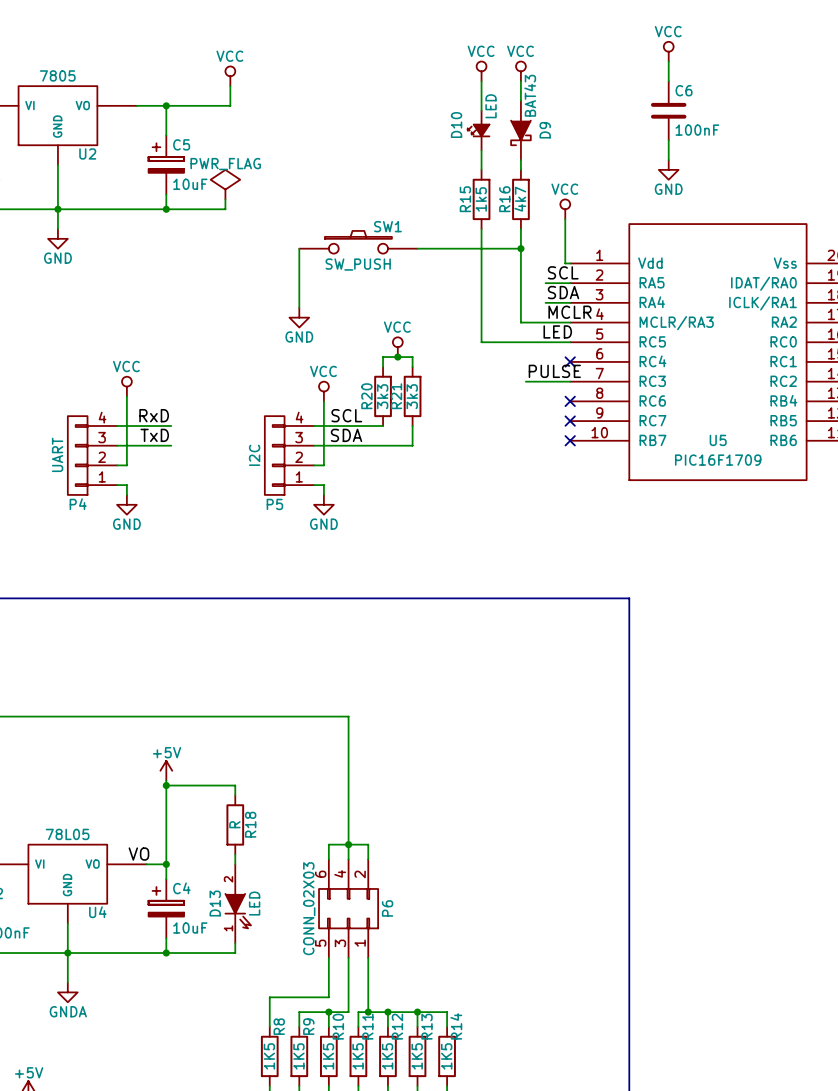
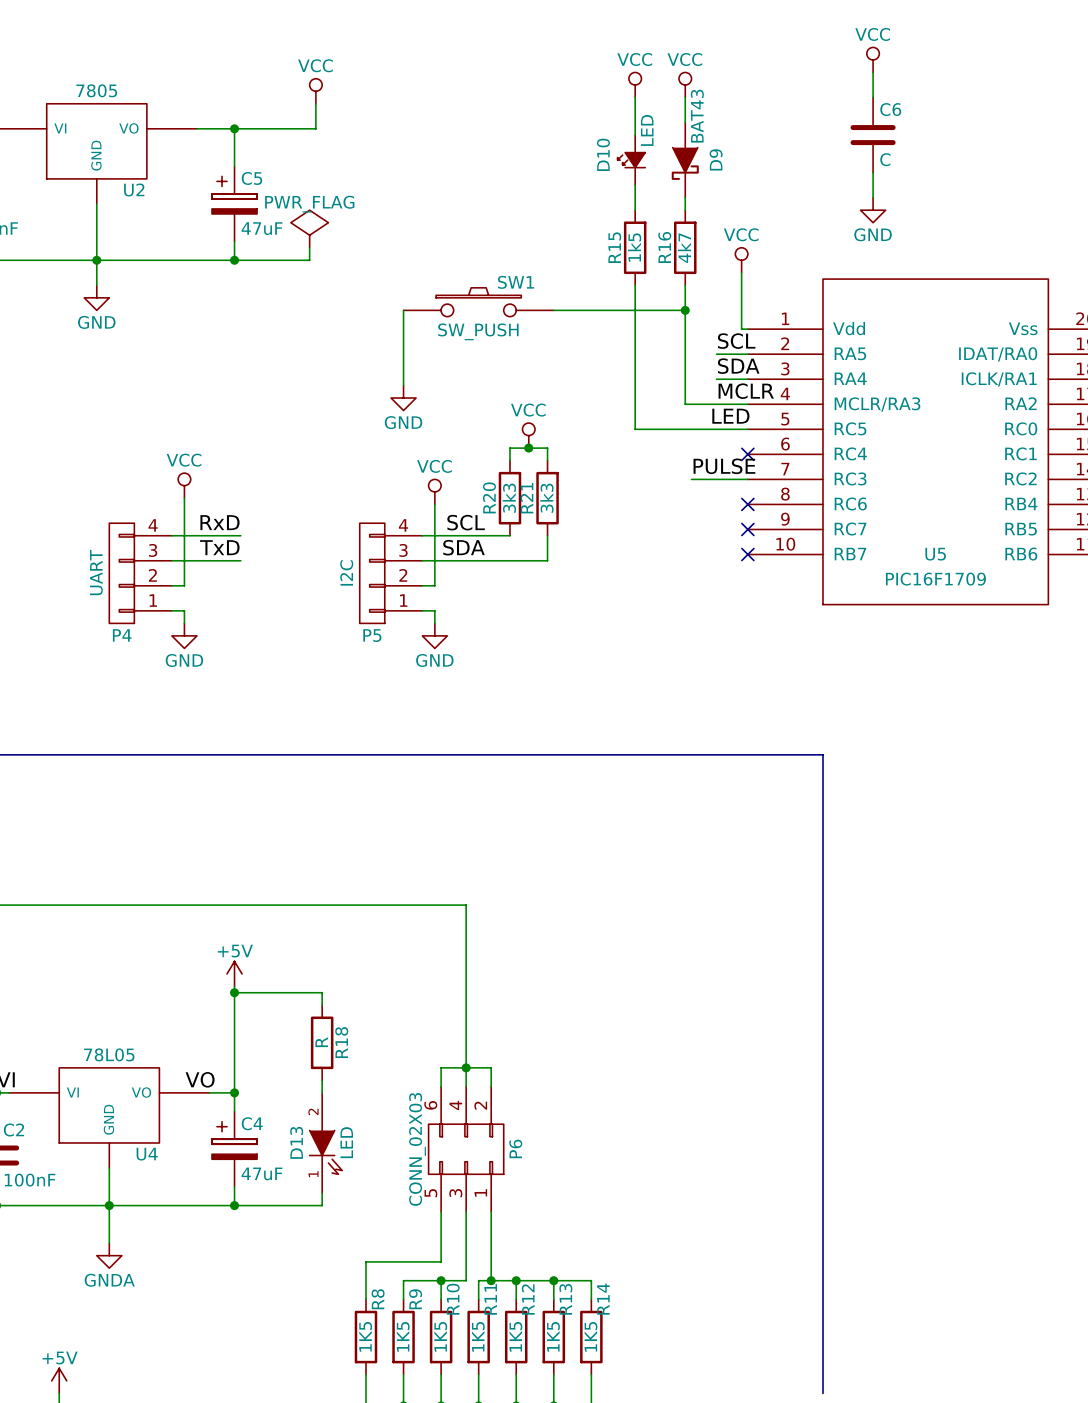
C6 value: 100nF (697, 130) -> C (885, 159)
C5 value: 10uF (190, 184) -> 47uF (262, 228)
C4 value: 10uF (190, 928) -> 47uF (262, 1173)

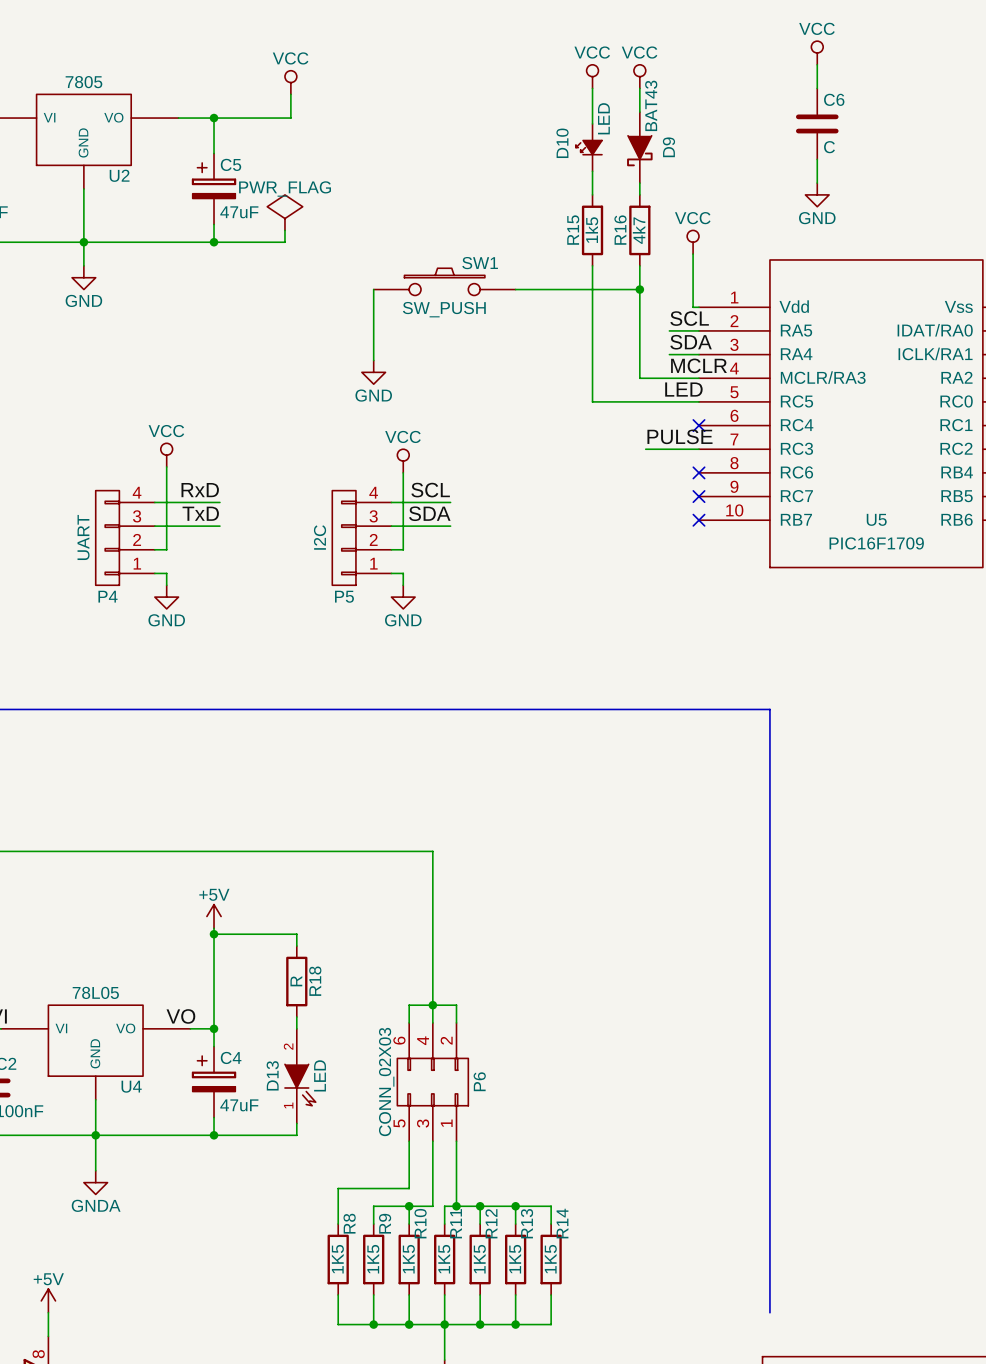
power symbol: VCC (528, 435) -> none
junction: (528, 448) -> none
wire: (509, 460) (509, 448) (547, 448) (547, 460) -> none
R20: 3k3 (509, 498) -> none
R21: 3k3 (547, 498) -> none
wire: (484, 535) (509, 535) -> none
wire: (547, 535) (547, 560) (484, 560) -> none

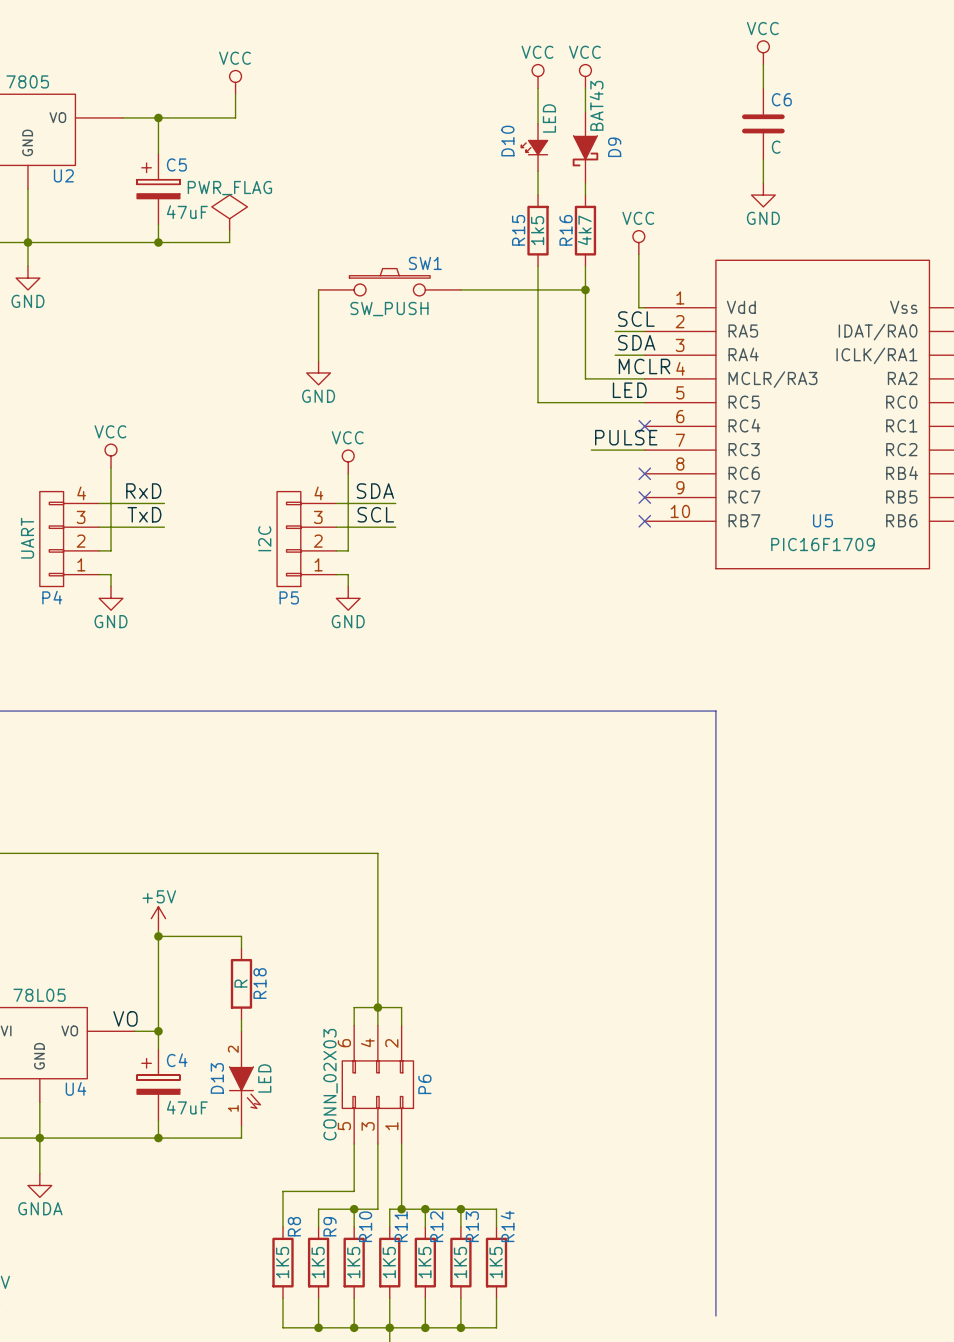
label: SCL (430, 490) -> SDA (375, 491)
label: SDA (429, 513) -> SCL (375, 514)

